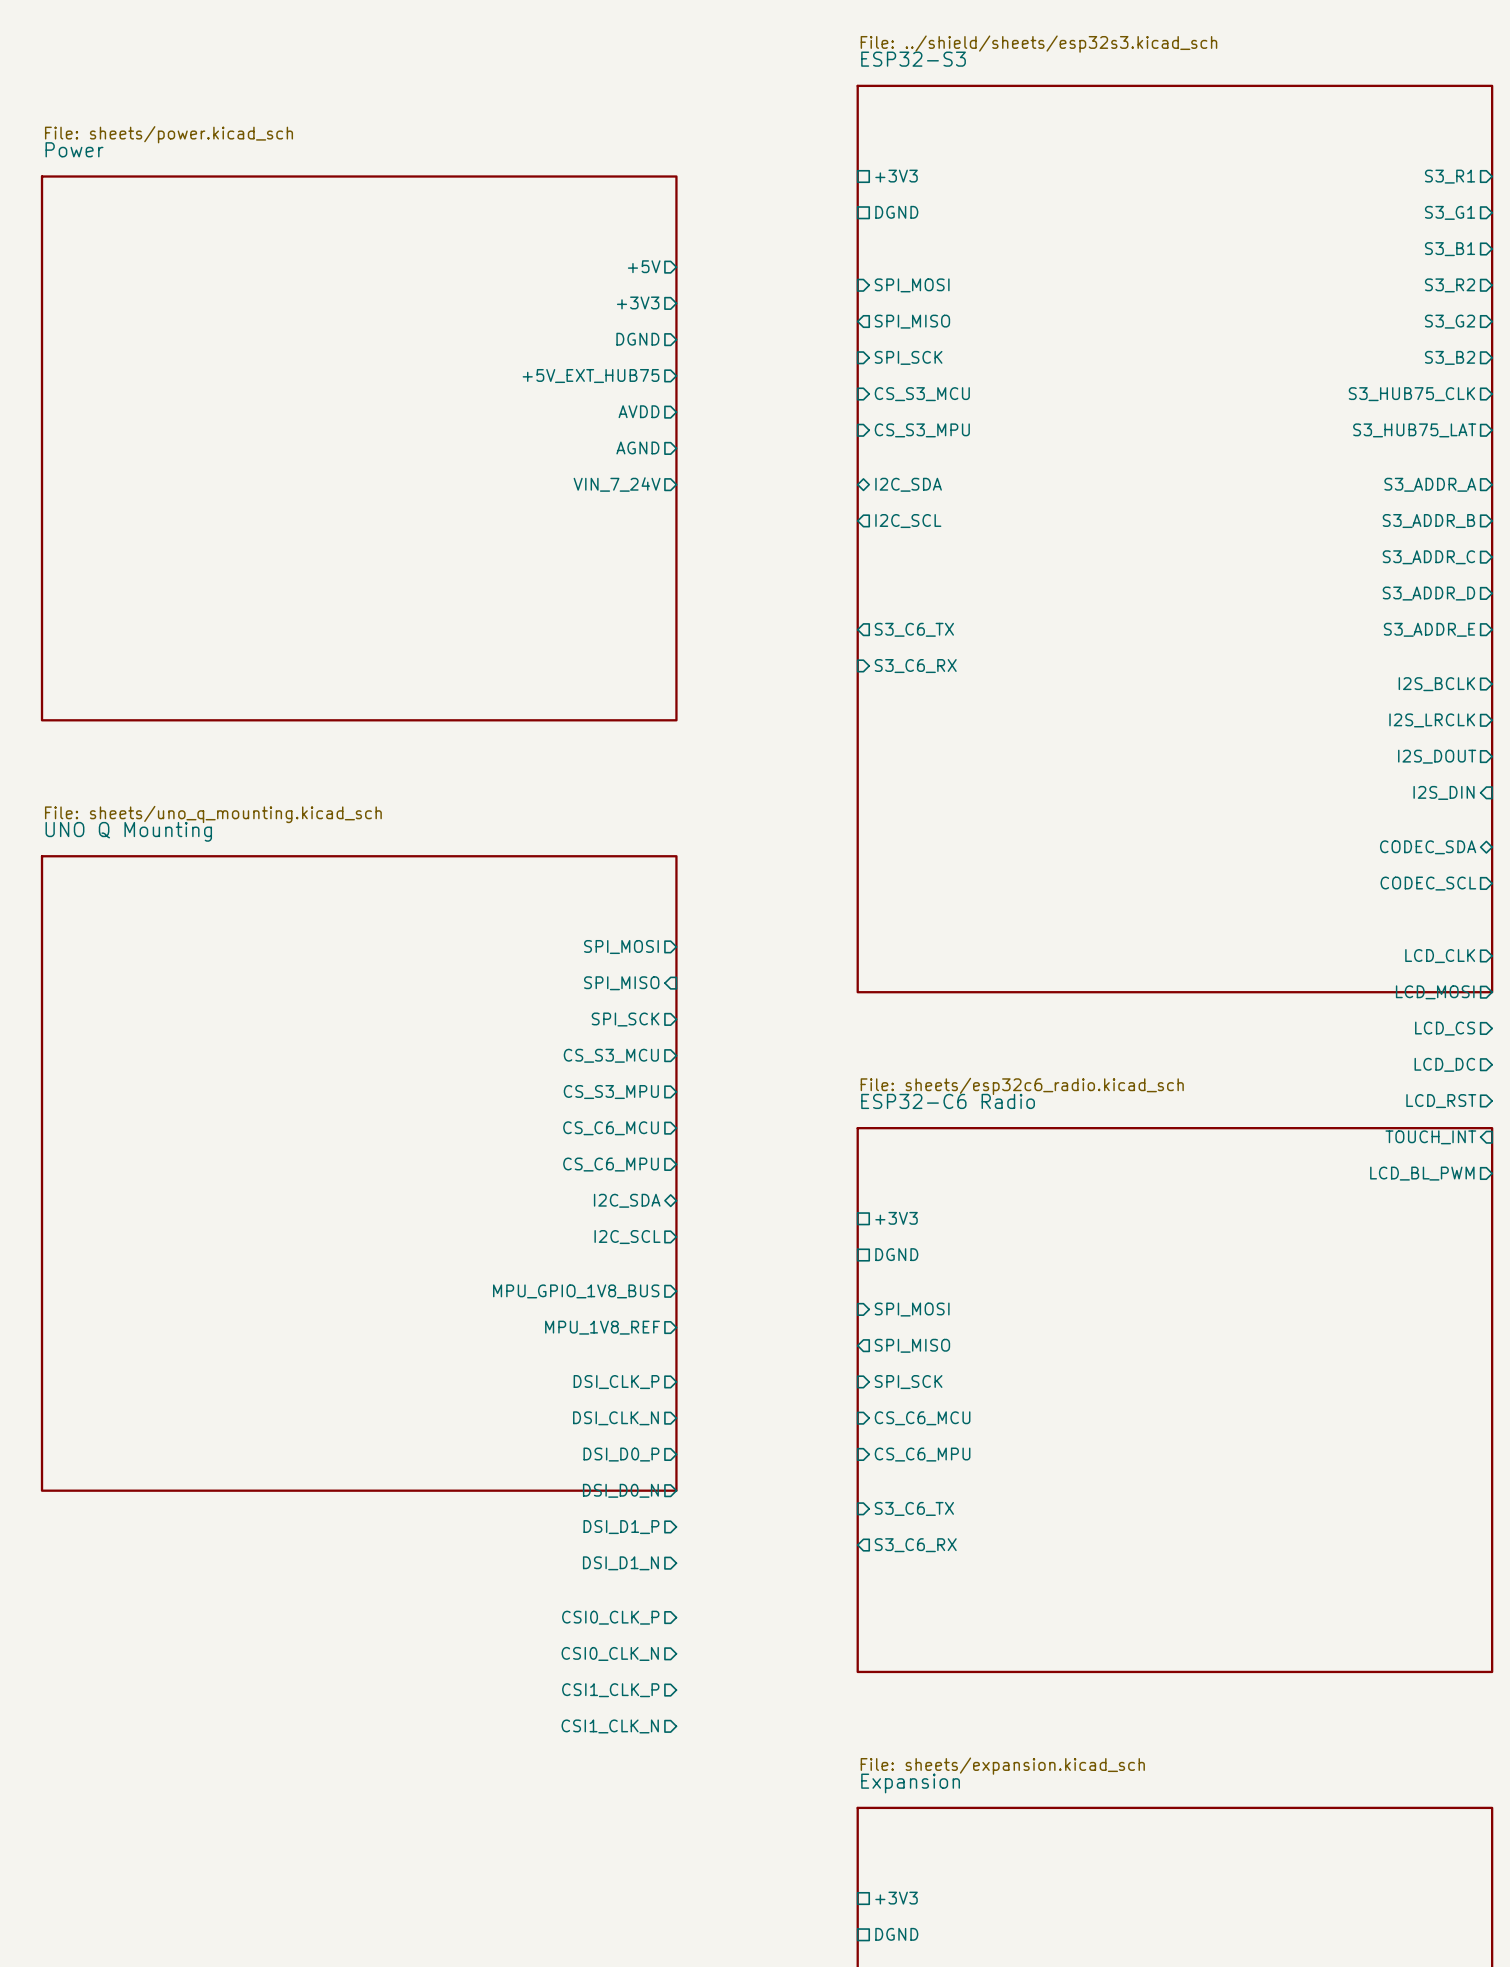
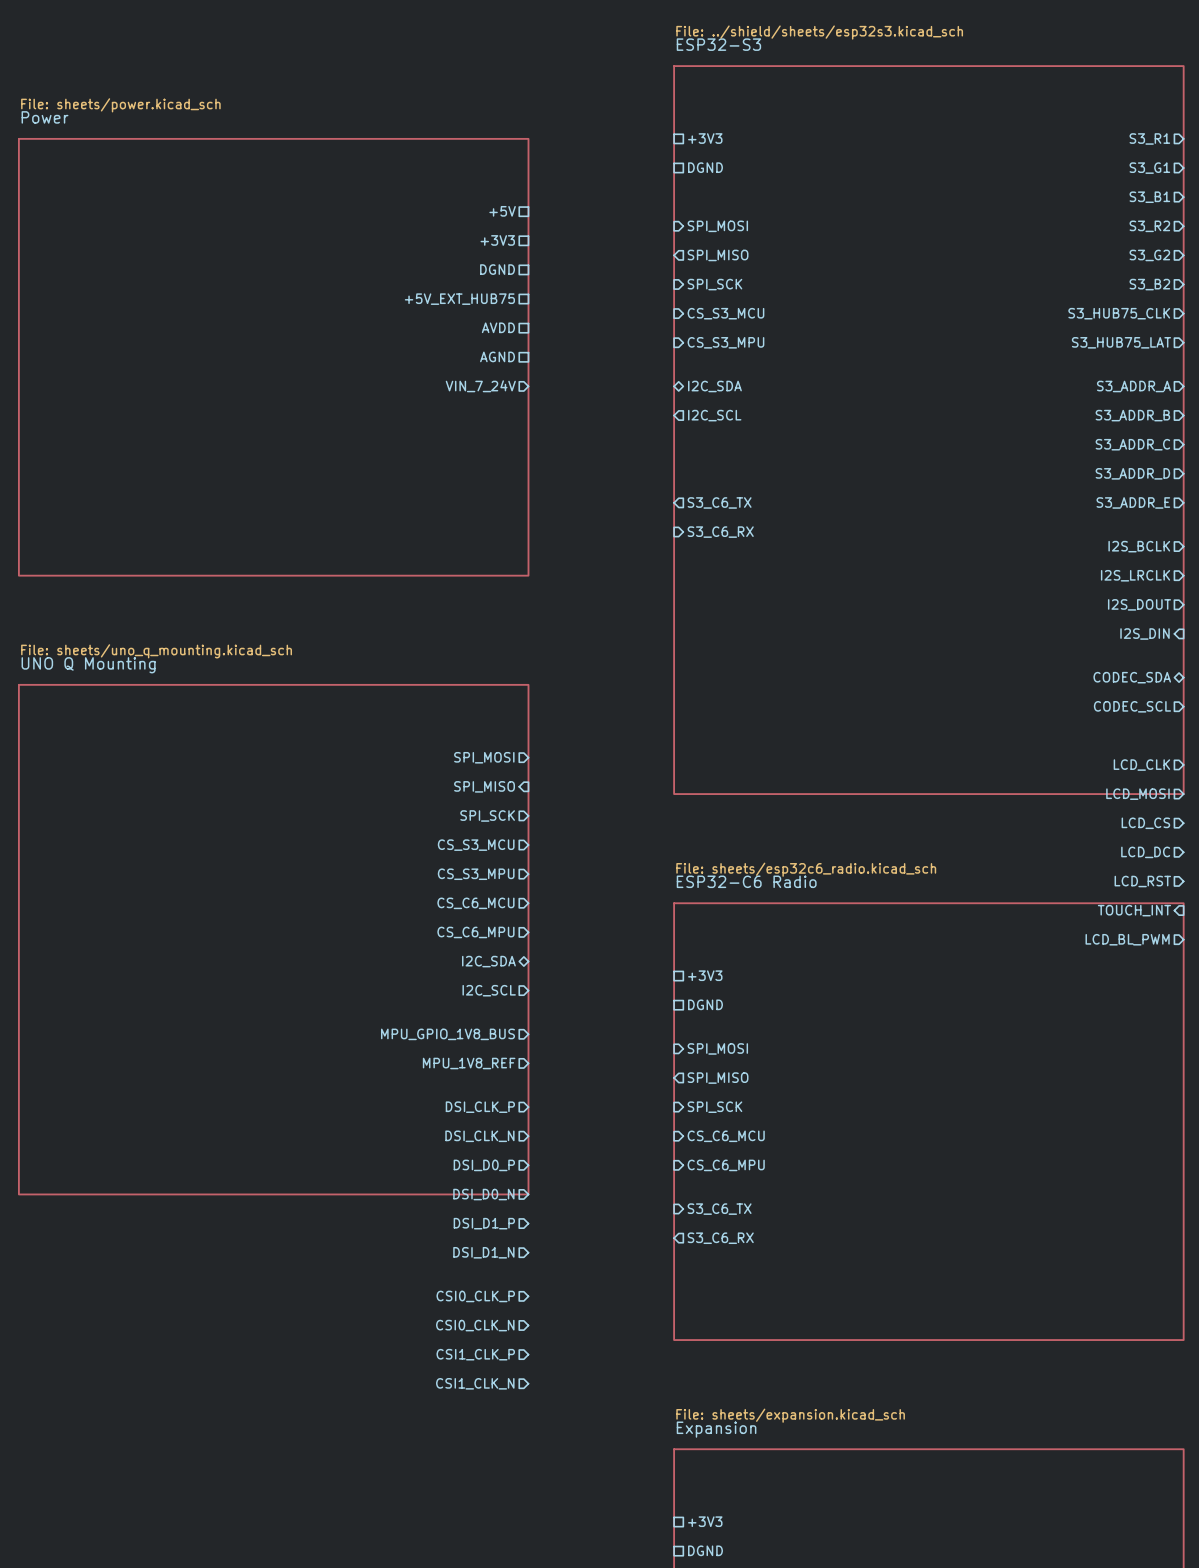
sheet pin shape: output (644, 266) -> passive (502, 211)
sheet pin shape: output (638, 302) -> passive (497, 240)
sheet pin shape: output (637, 339) -> passive (497, 269)
sheet pin shape: output (591, 376) -> passive (459, 299)
sheet pin shape: output (638, 411) -> passive (498, 327)
sheet pin shape: output (637, 447) -> passive (497, 356)

